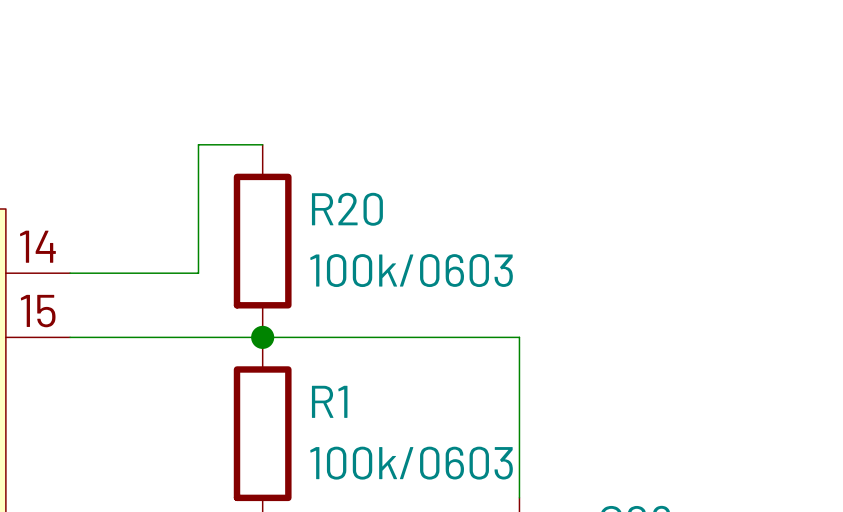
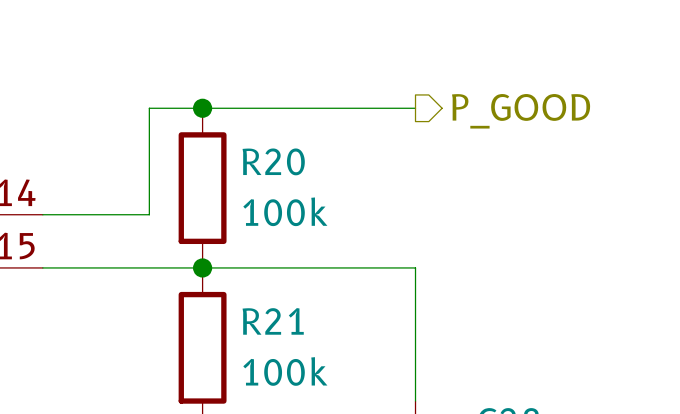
hierarchical label: none -> P_GOOD (521, 111)
wire: none -> (202, 108) (415, 108)
junction: none -> (202, 108)
R20 value: 100k/0603 (411, 270) -> 100k (285, 211)
R1 name: R1 (329, 401) -> R21 (273, 321)
R1 value: 100k/0603 (411, 463) -> 100k (285, 371)

